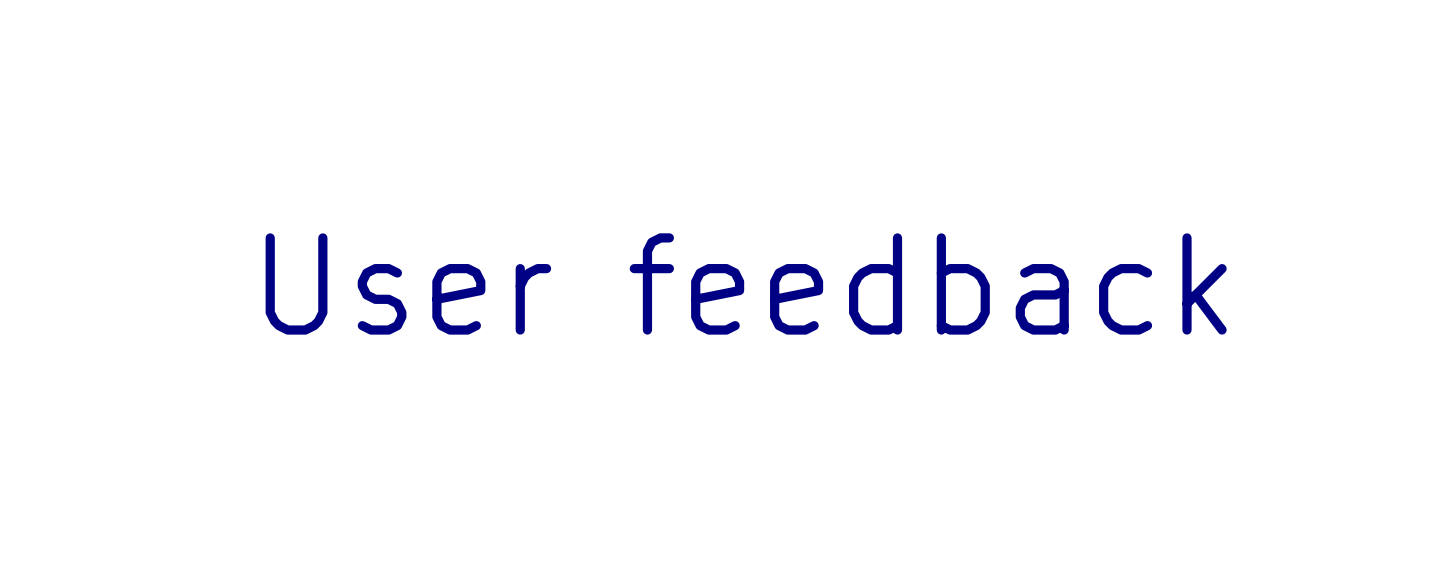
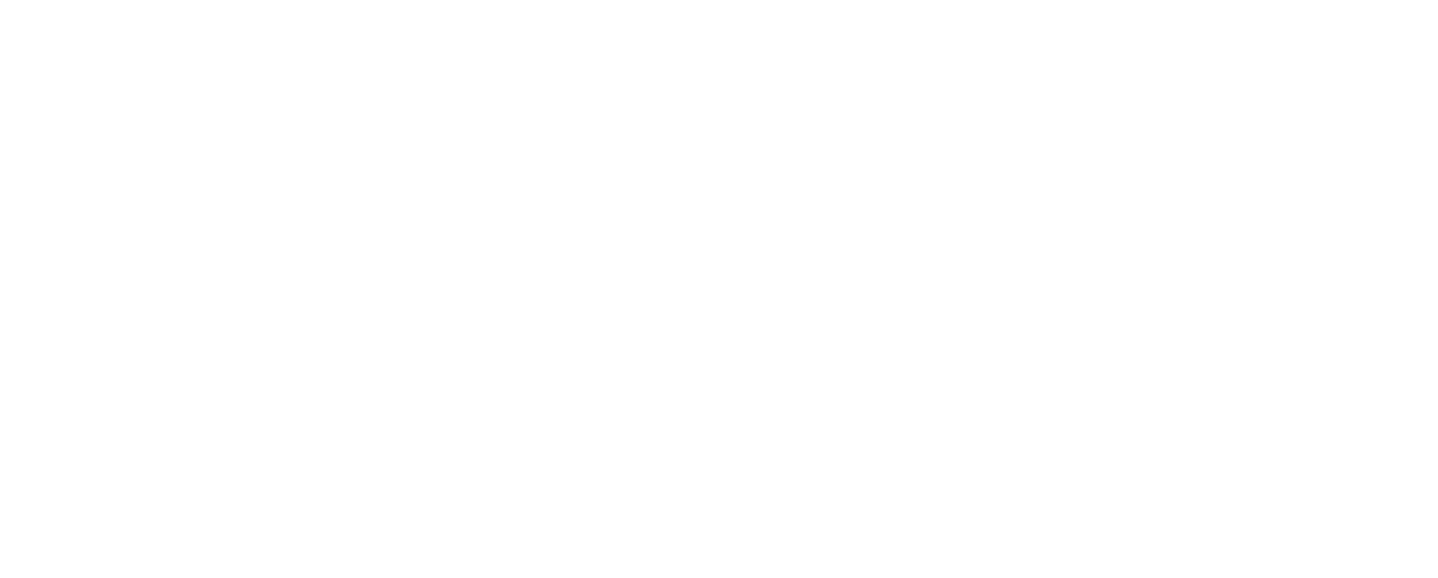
text: User feedback (746, 283) -> none

